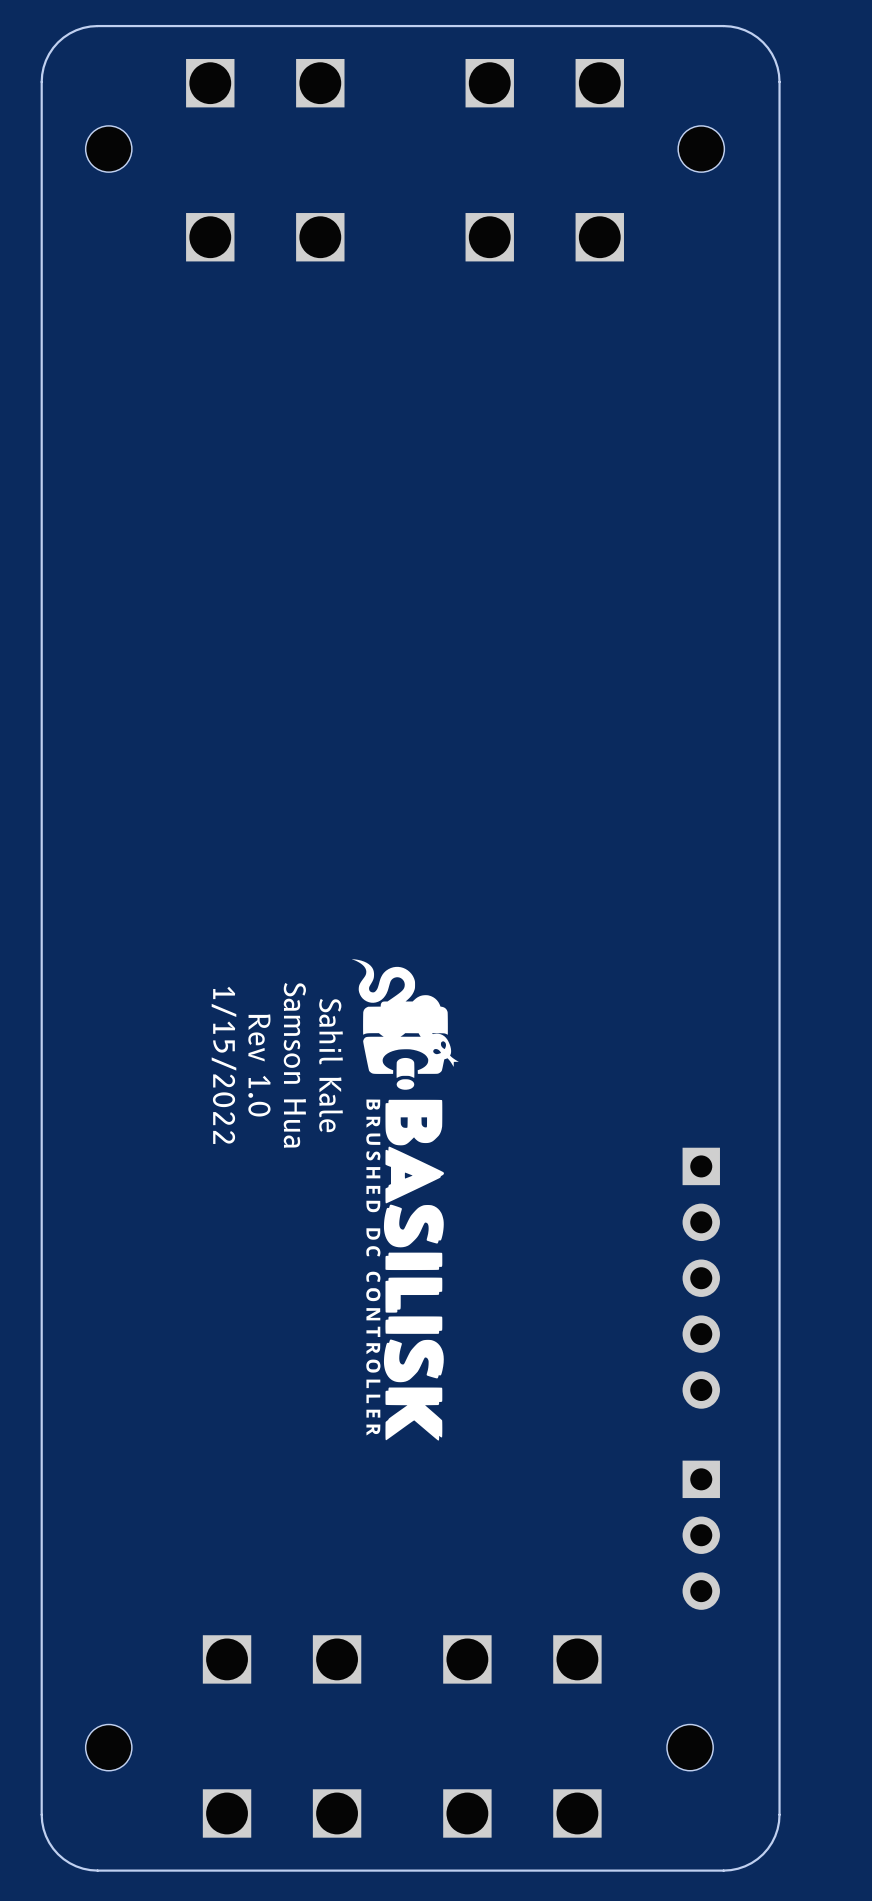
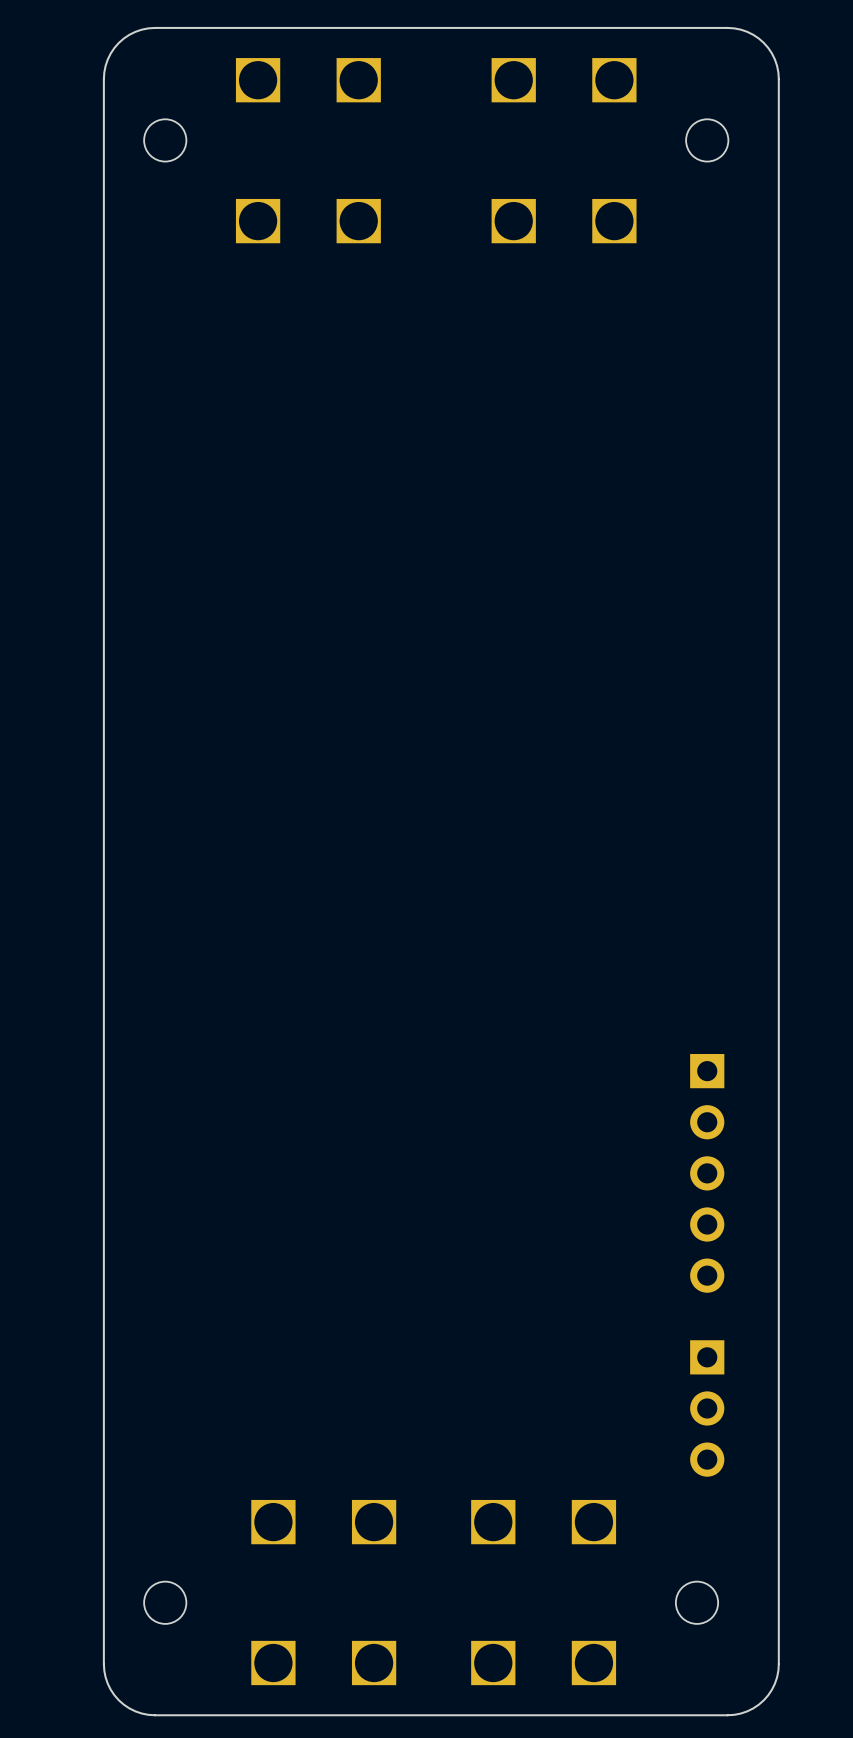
drawing: [351, 959, 459, 1441] -> none
text: 1/15/2022 (223, 1065) -> none
text: Rev 1.0 (259, 1065) -> none
text: Samson Hua (294, 1065) -> none
text: Sahil Kale (331, 1065) -> none

